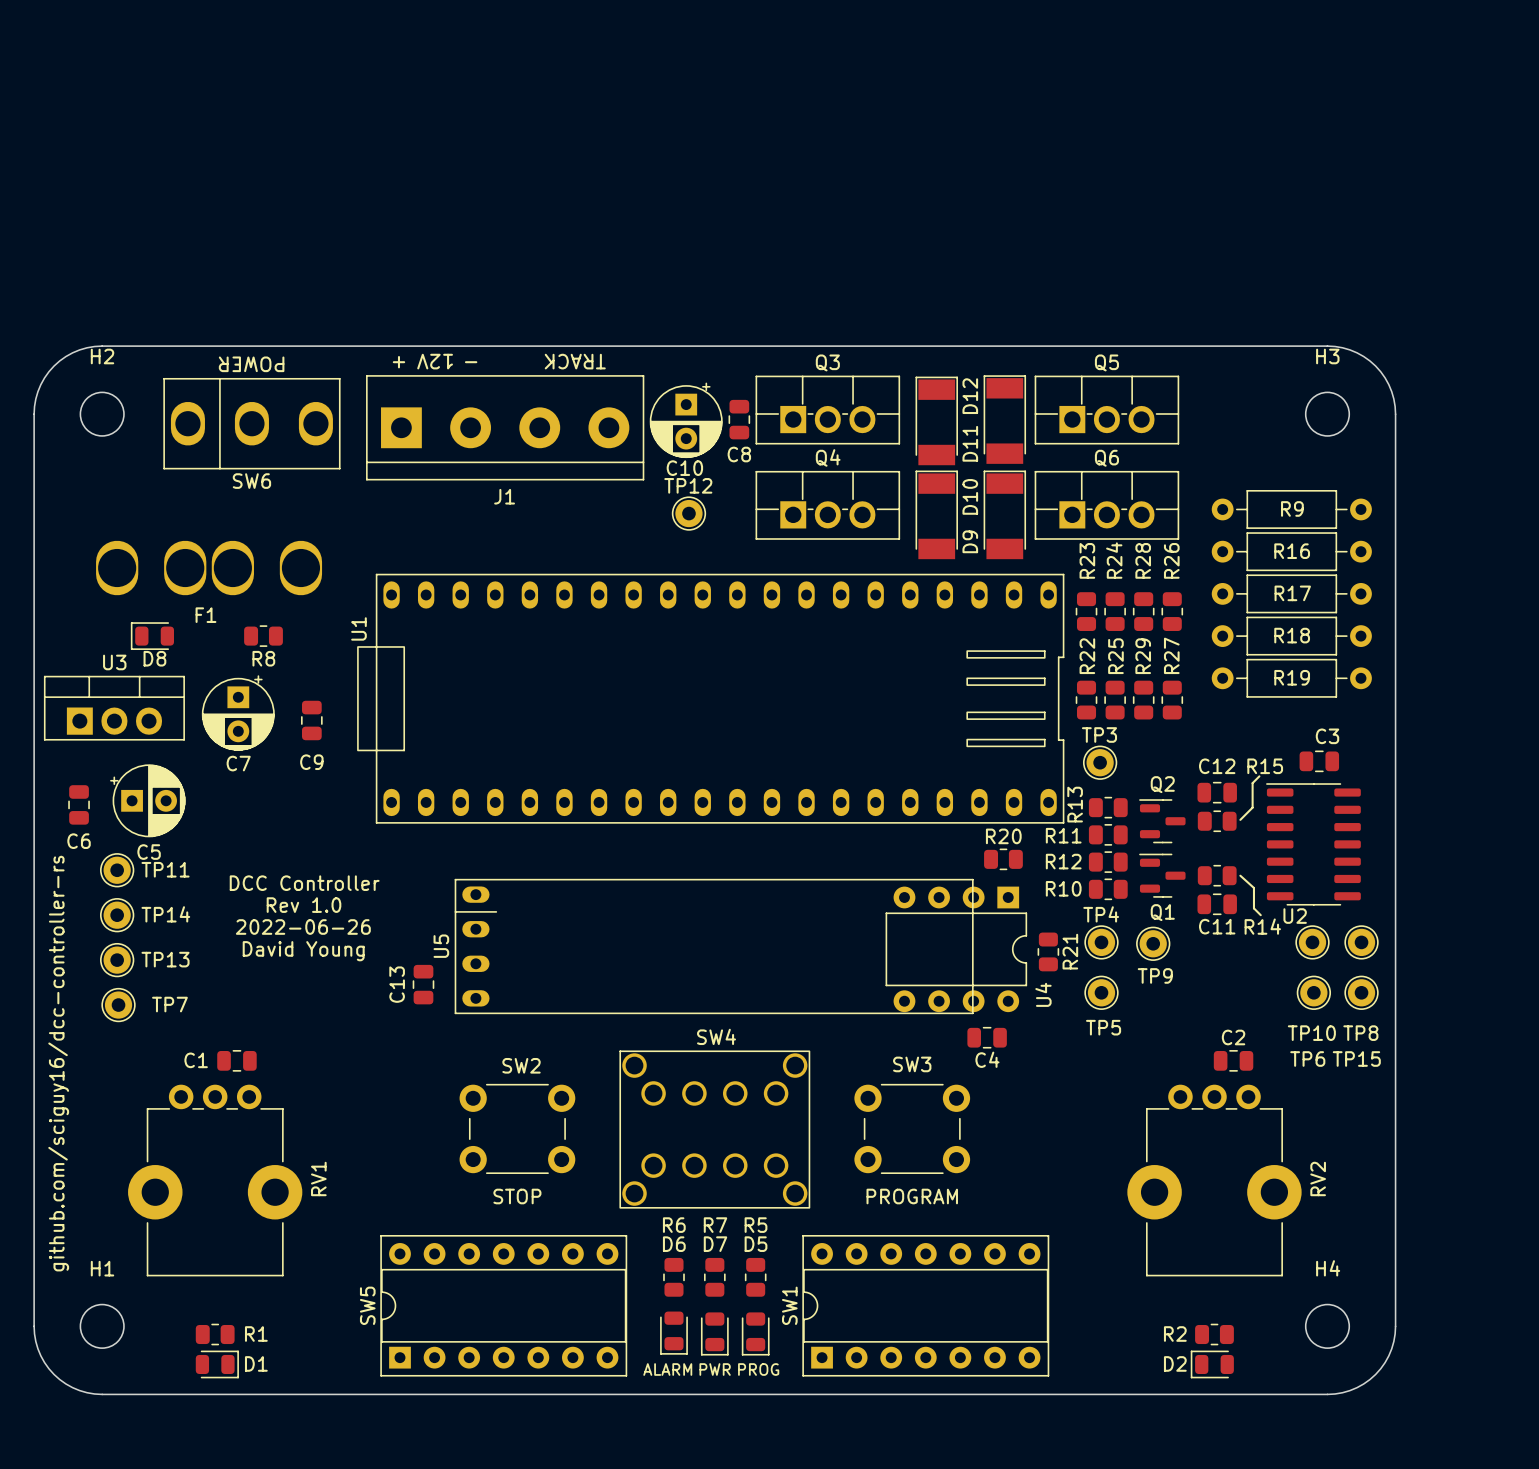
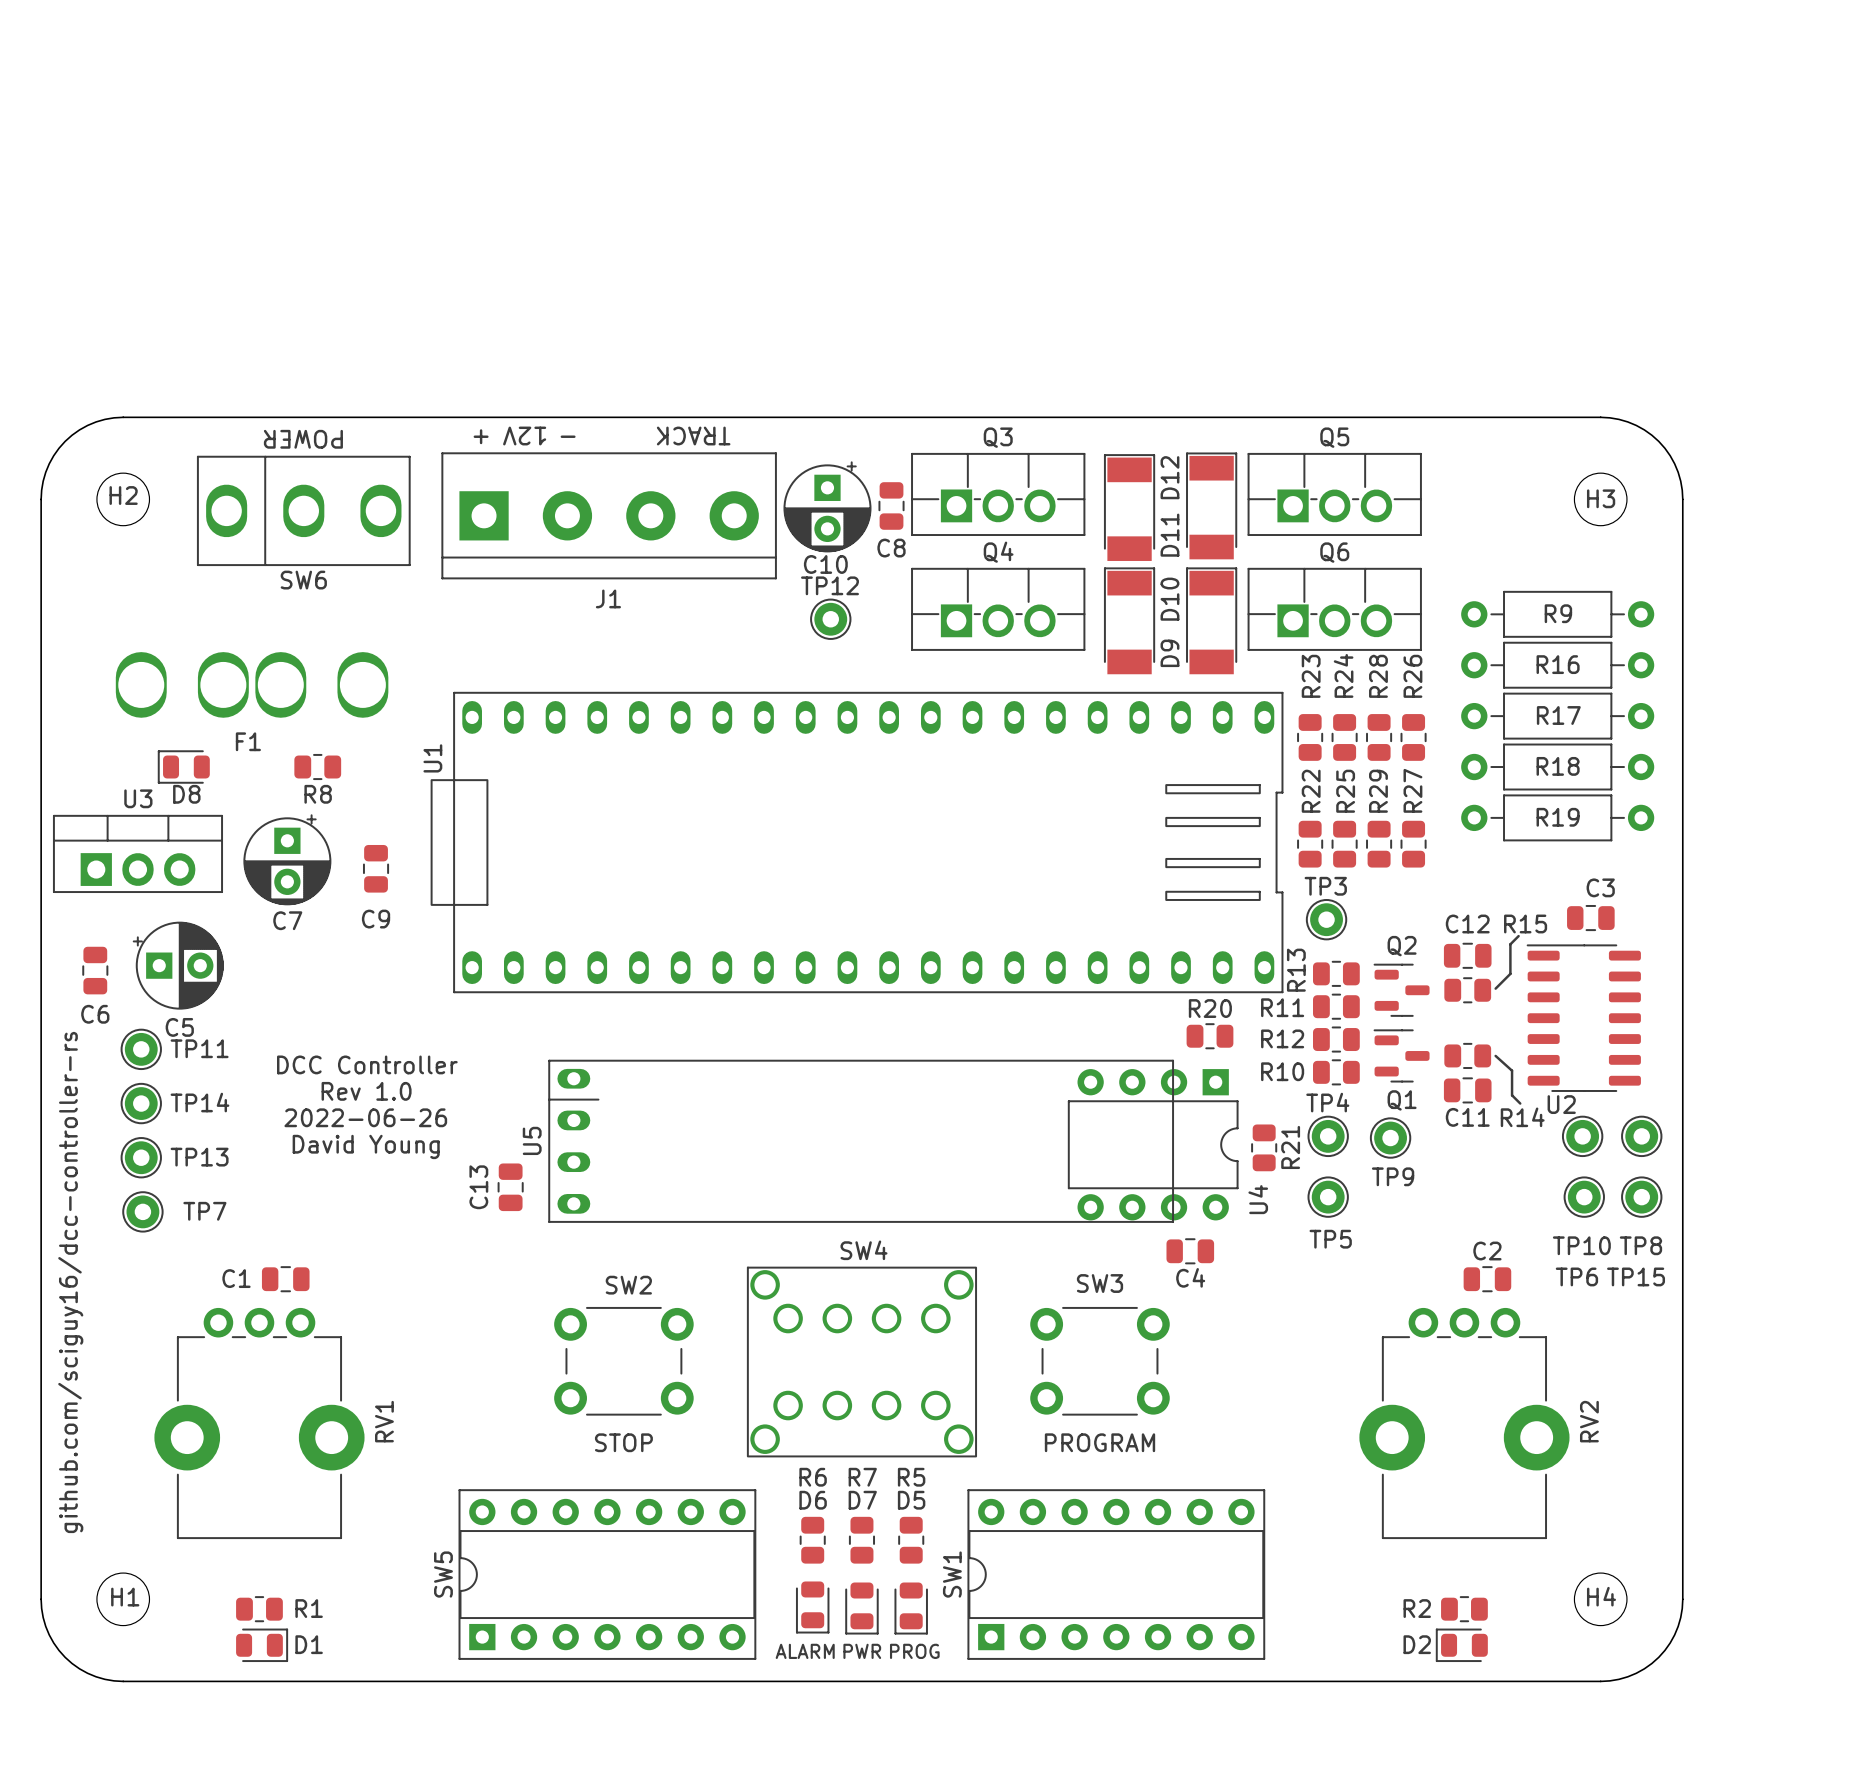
H2 name position: H2 (102, 356) -> H2 (123, 495)
H3 name position: H3 (1327, 356) -> H3 (1601, 498)
H1 name position: H1 (102, 1268) -> H1 (125, 1597)
H4 name position: H4 (1328, 1268) -> H4 (1601, 1596)

